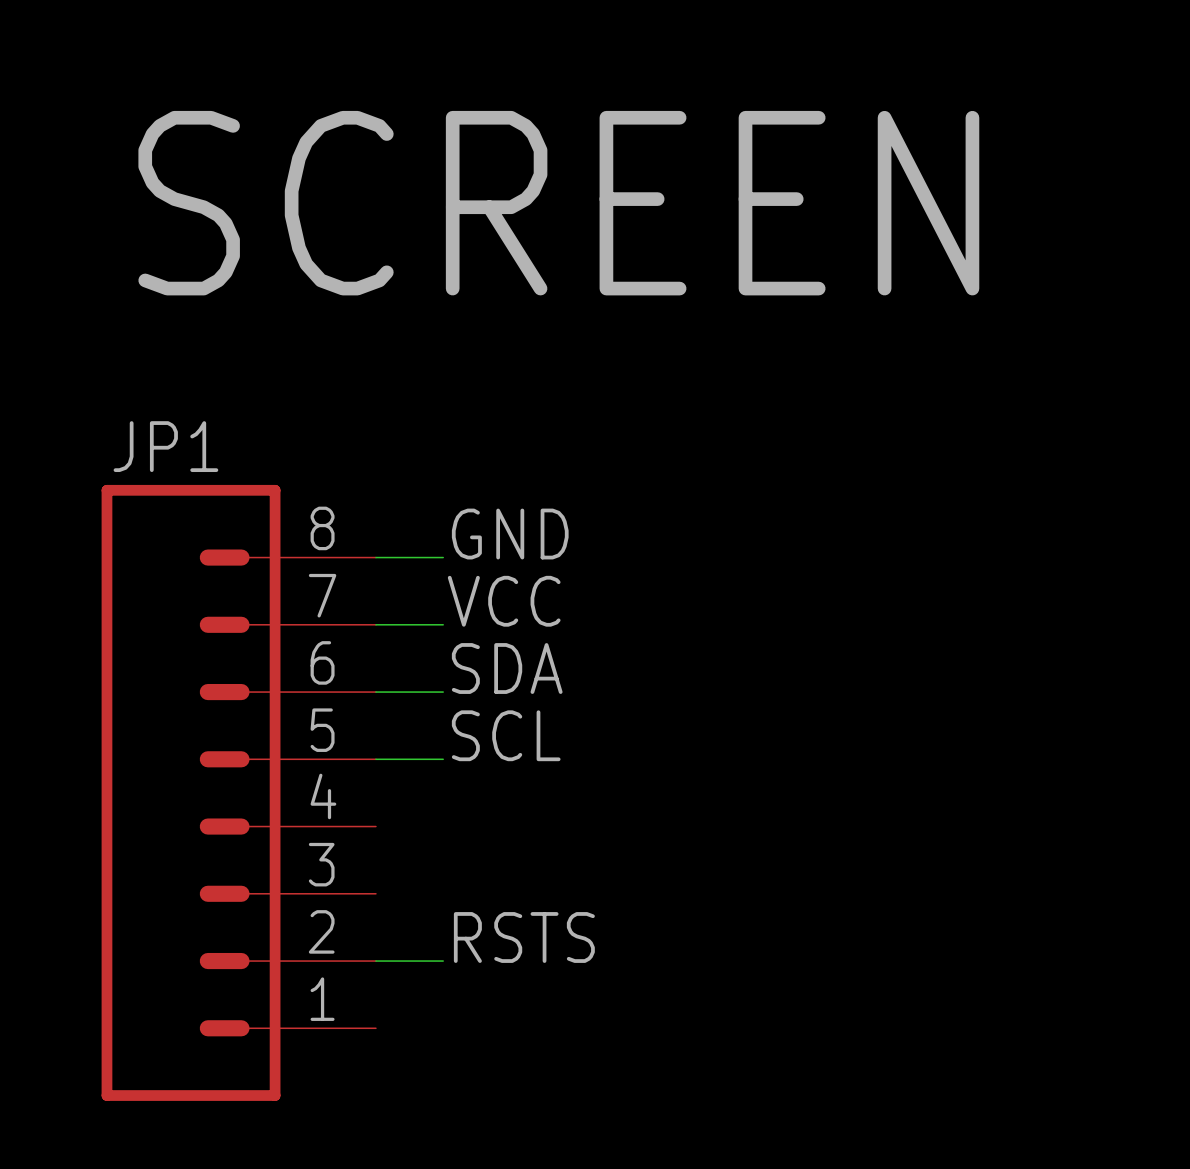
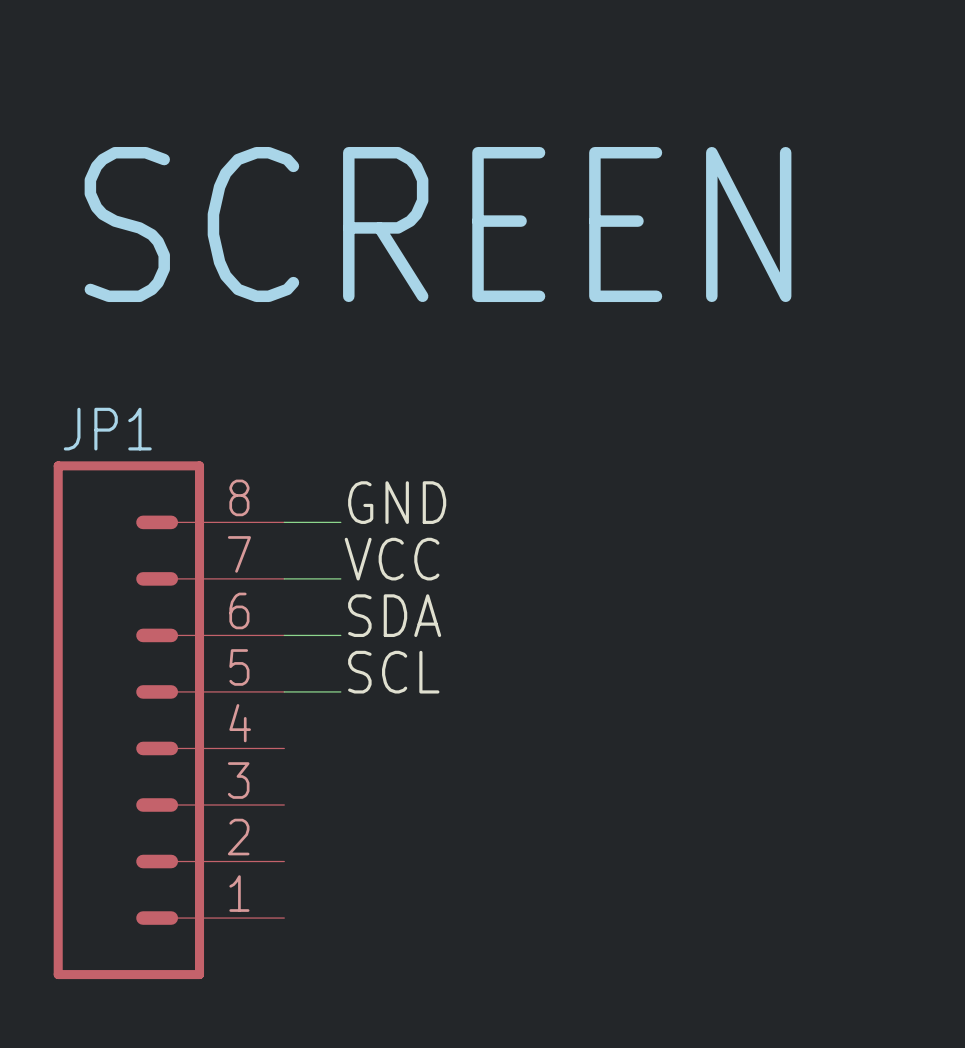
label: RSTS (524, 937) -> none
wire: (375, 961) (443, 961) -> none

